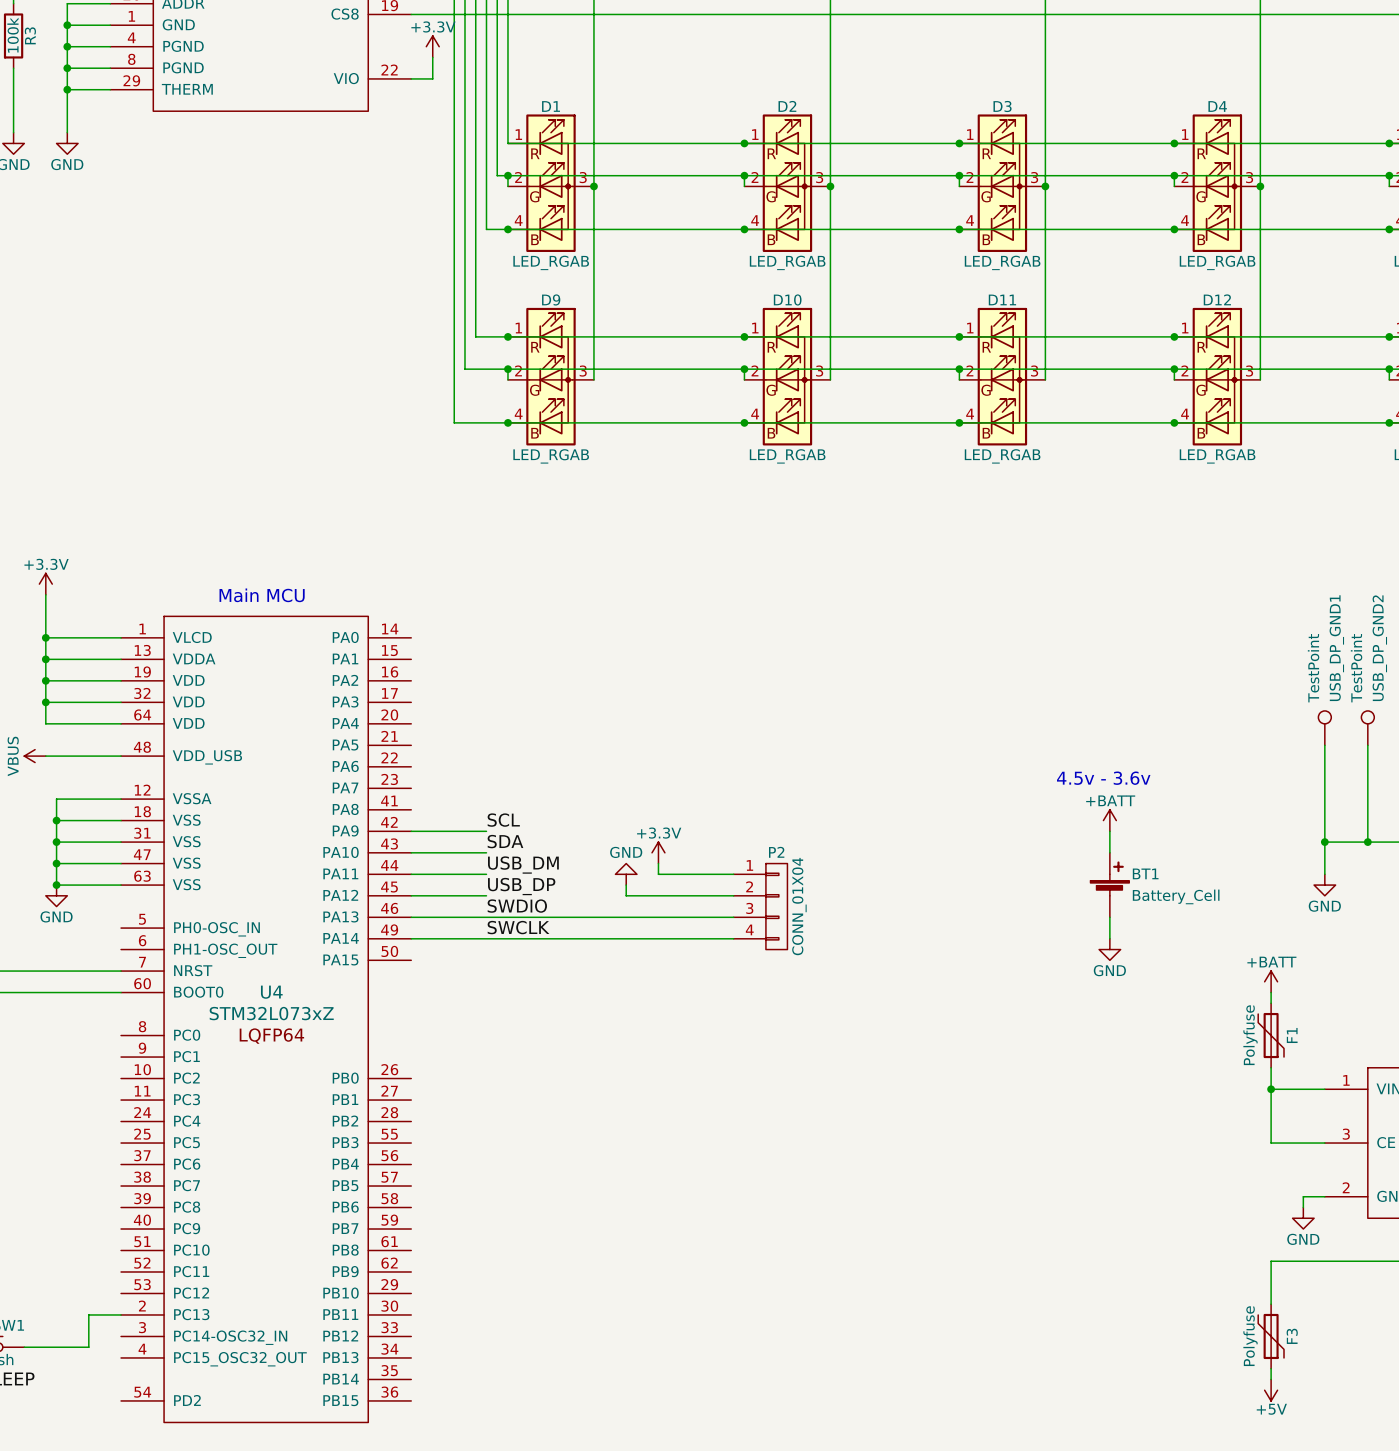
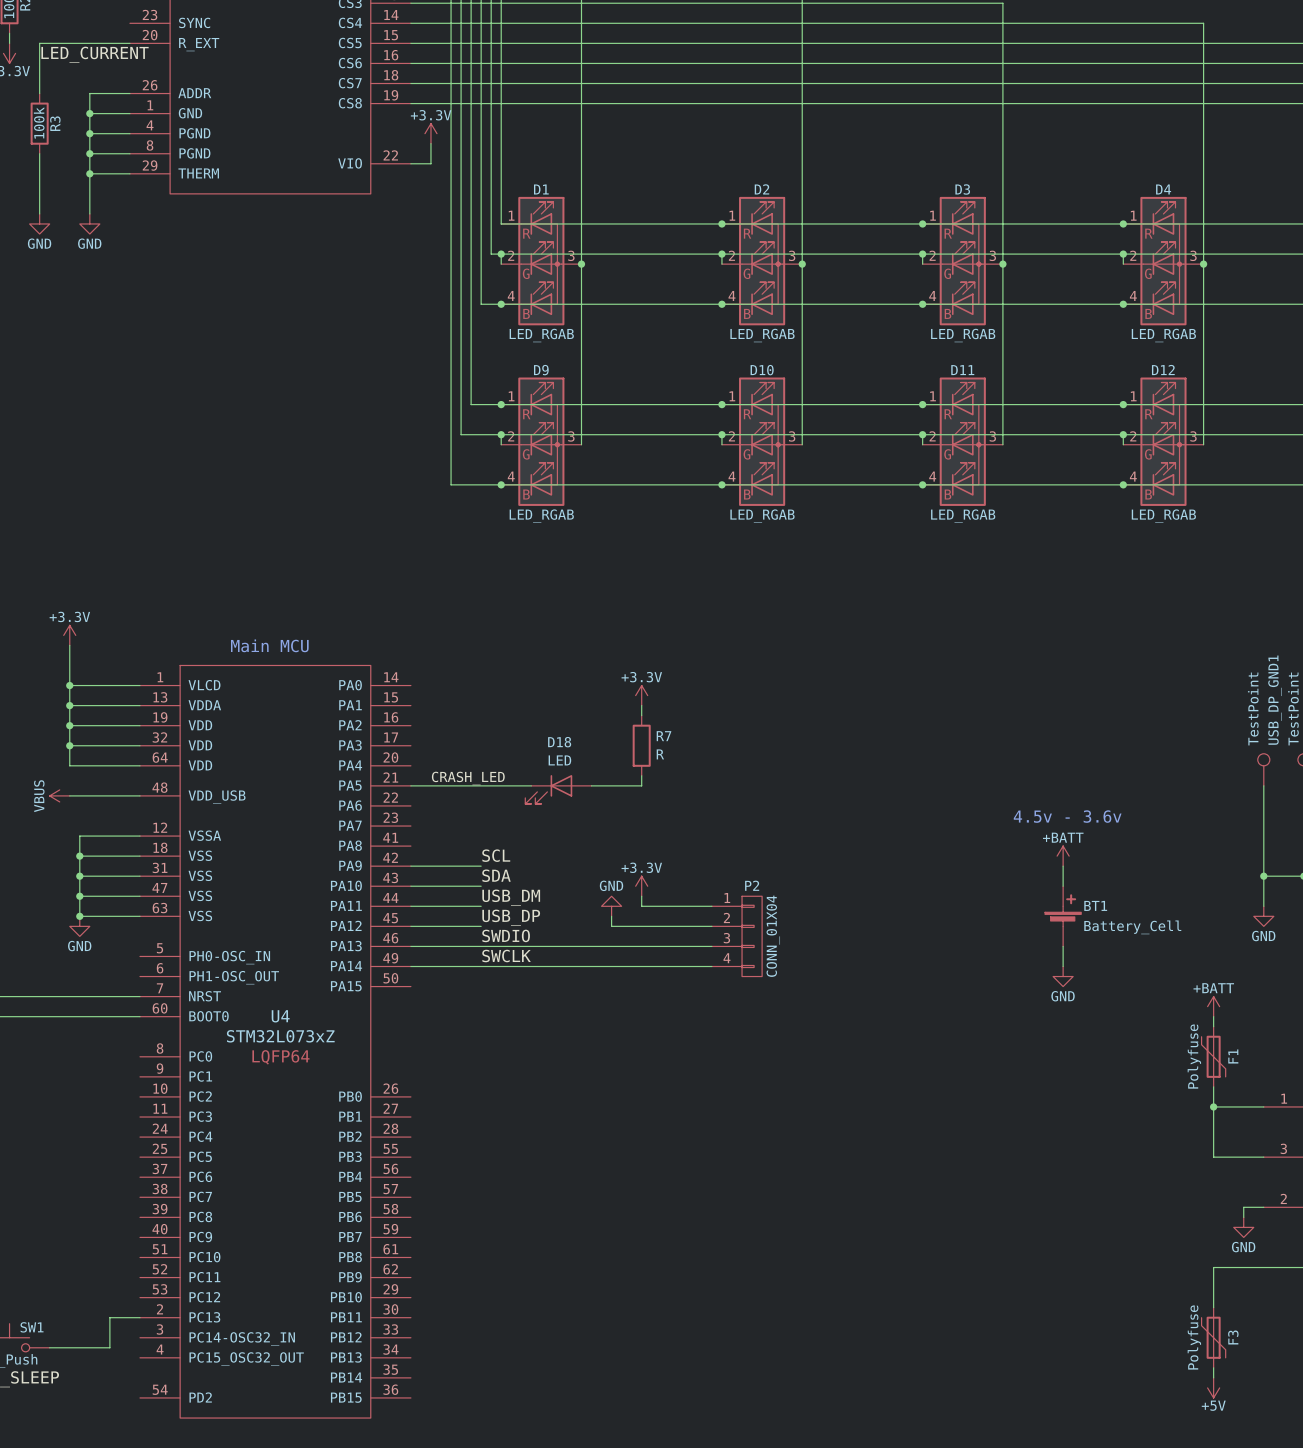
power symbol: none -> +3.3V (641, 695)
wire: none -> (641, 705) (641, 715)
R7: none -> R (641, 745)
wire: none -> (641, 775) (641, 785) (591, 785)
label: none -> CRASH_LED (468, 778)
wire: none -> (410, 785) (531, 785)
D18: none -> LED (558, 789)

